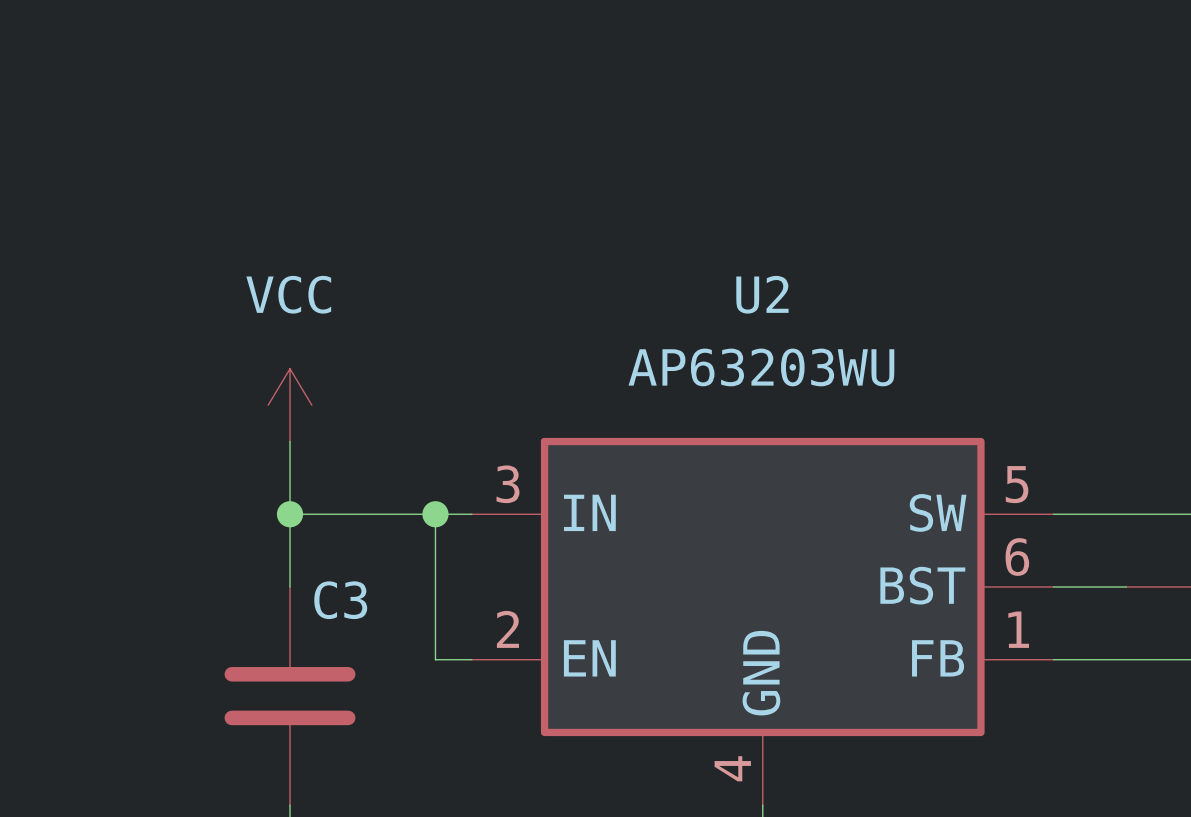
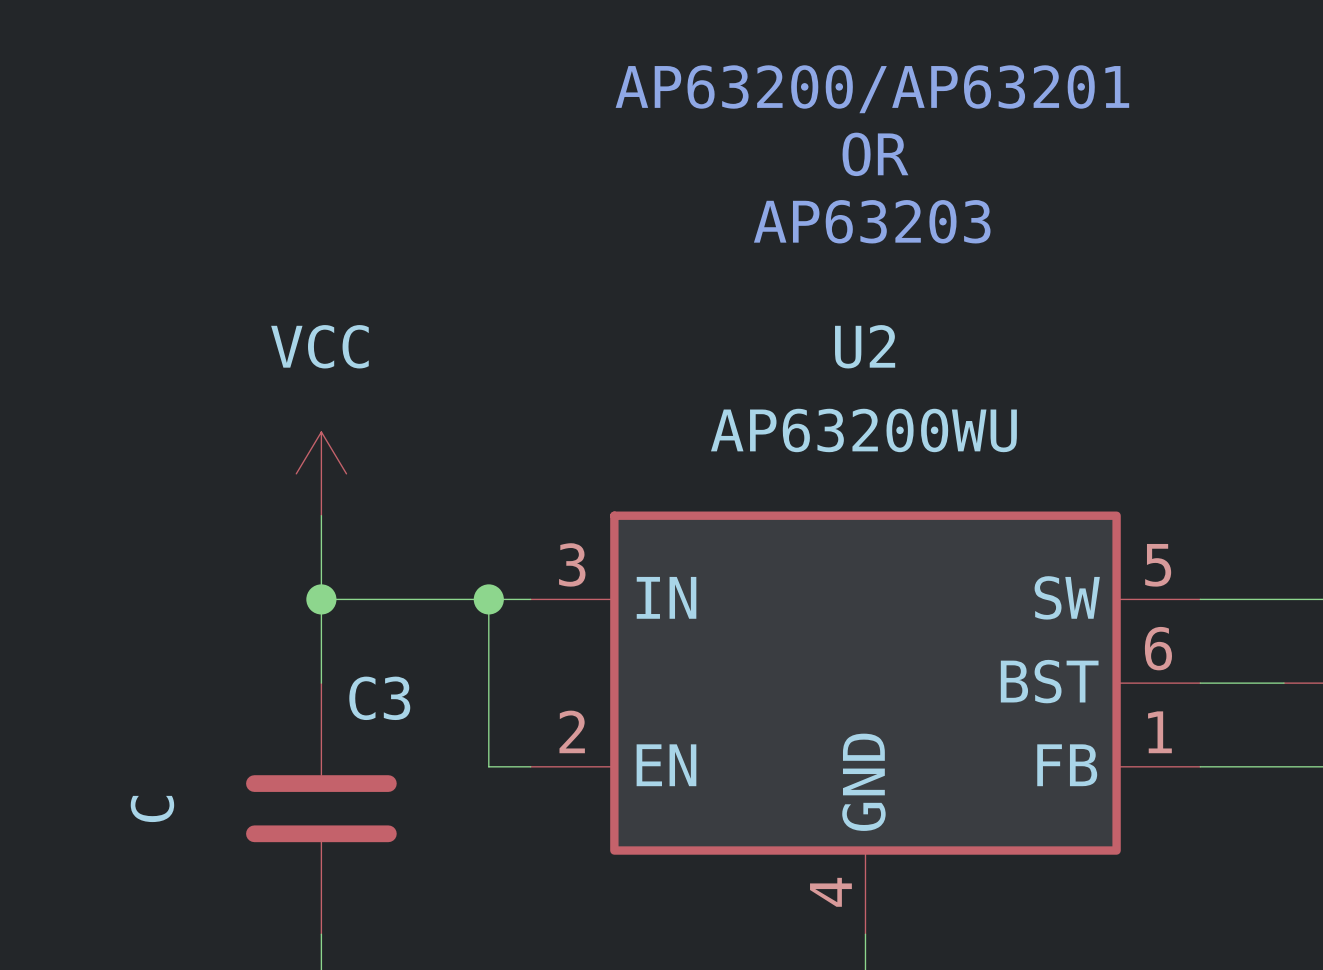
text: none -> AP63200/AP63201 (872, 89)
text: none -> OR (875, 154)
text: none -> AP63203 (872, 221)
U2 value: AP63203WU (761, 367) -> AP63200WU (863, 430)
C3 value: none -> C (152, 808)

